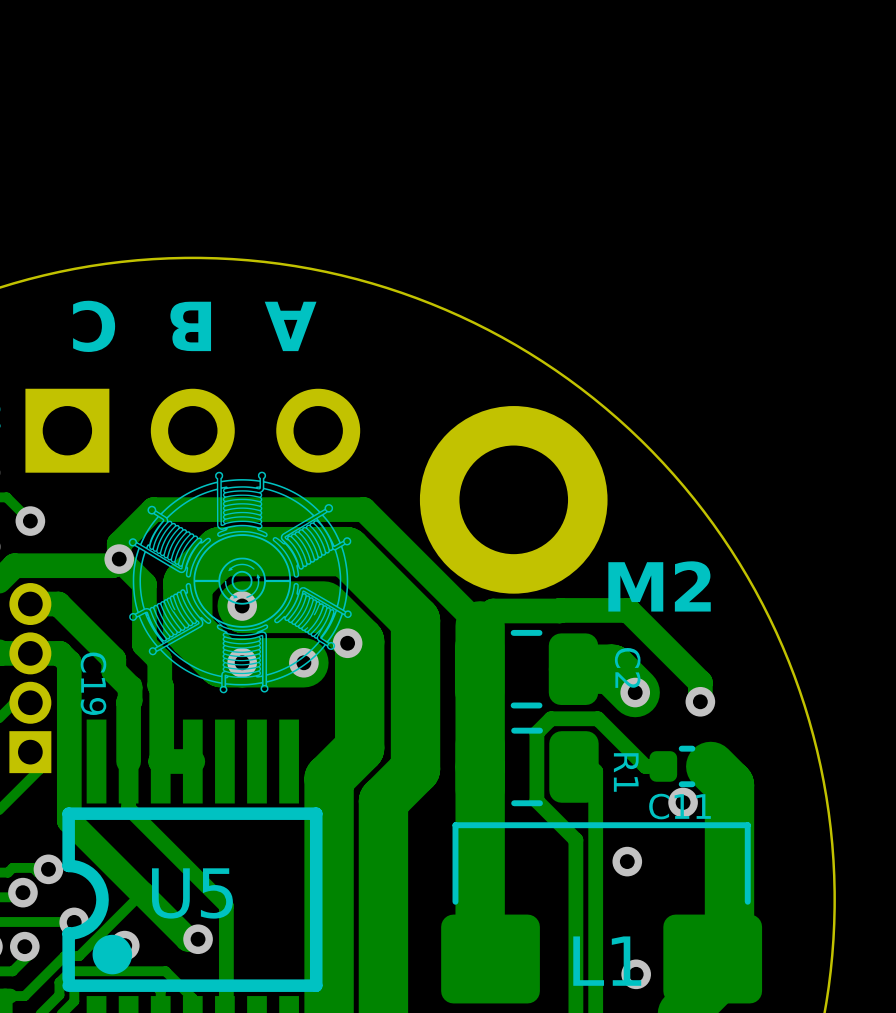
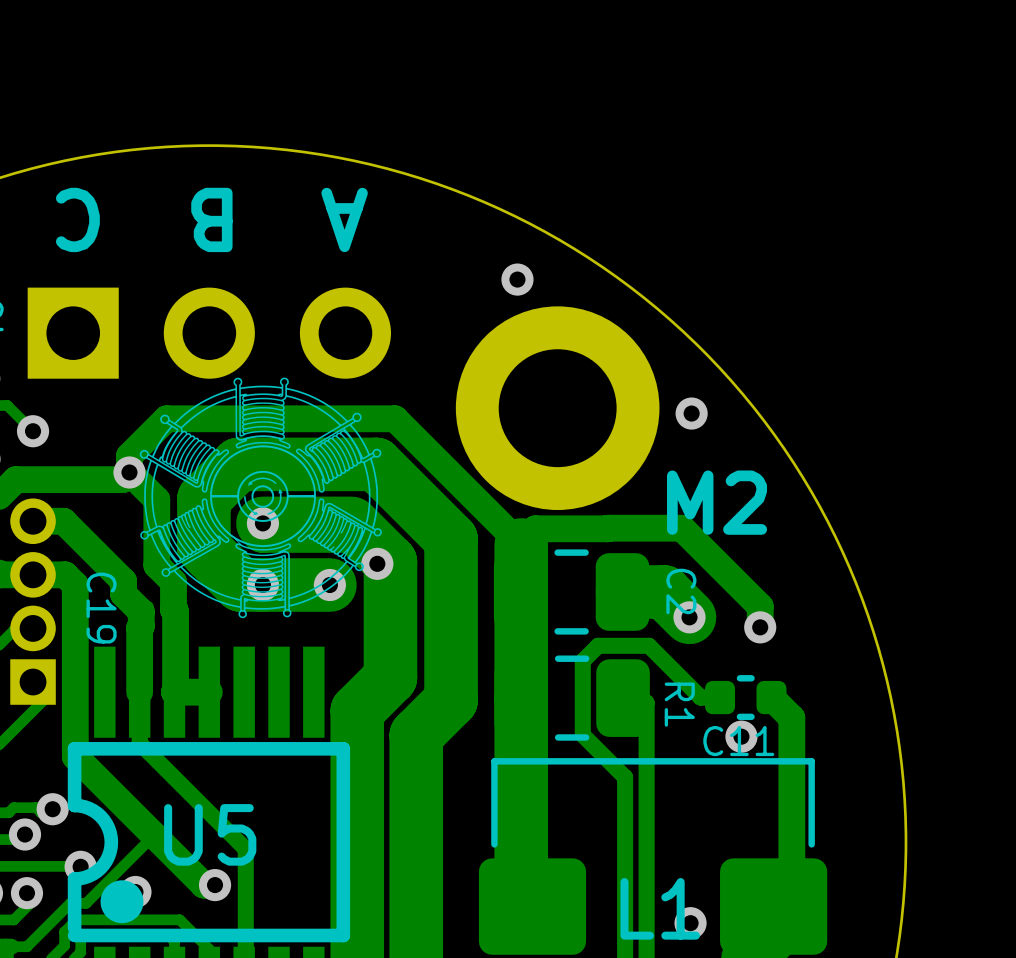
via: none -> (517, 279)
via: none -> (691, 413)
track width: thick (710, 766) (729, 785) (729, 935) -> thin (771, 697) (791, 717) (791, 881)
via: (627, 861) -> none

